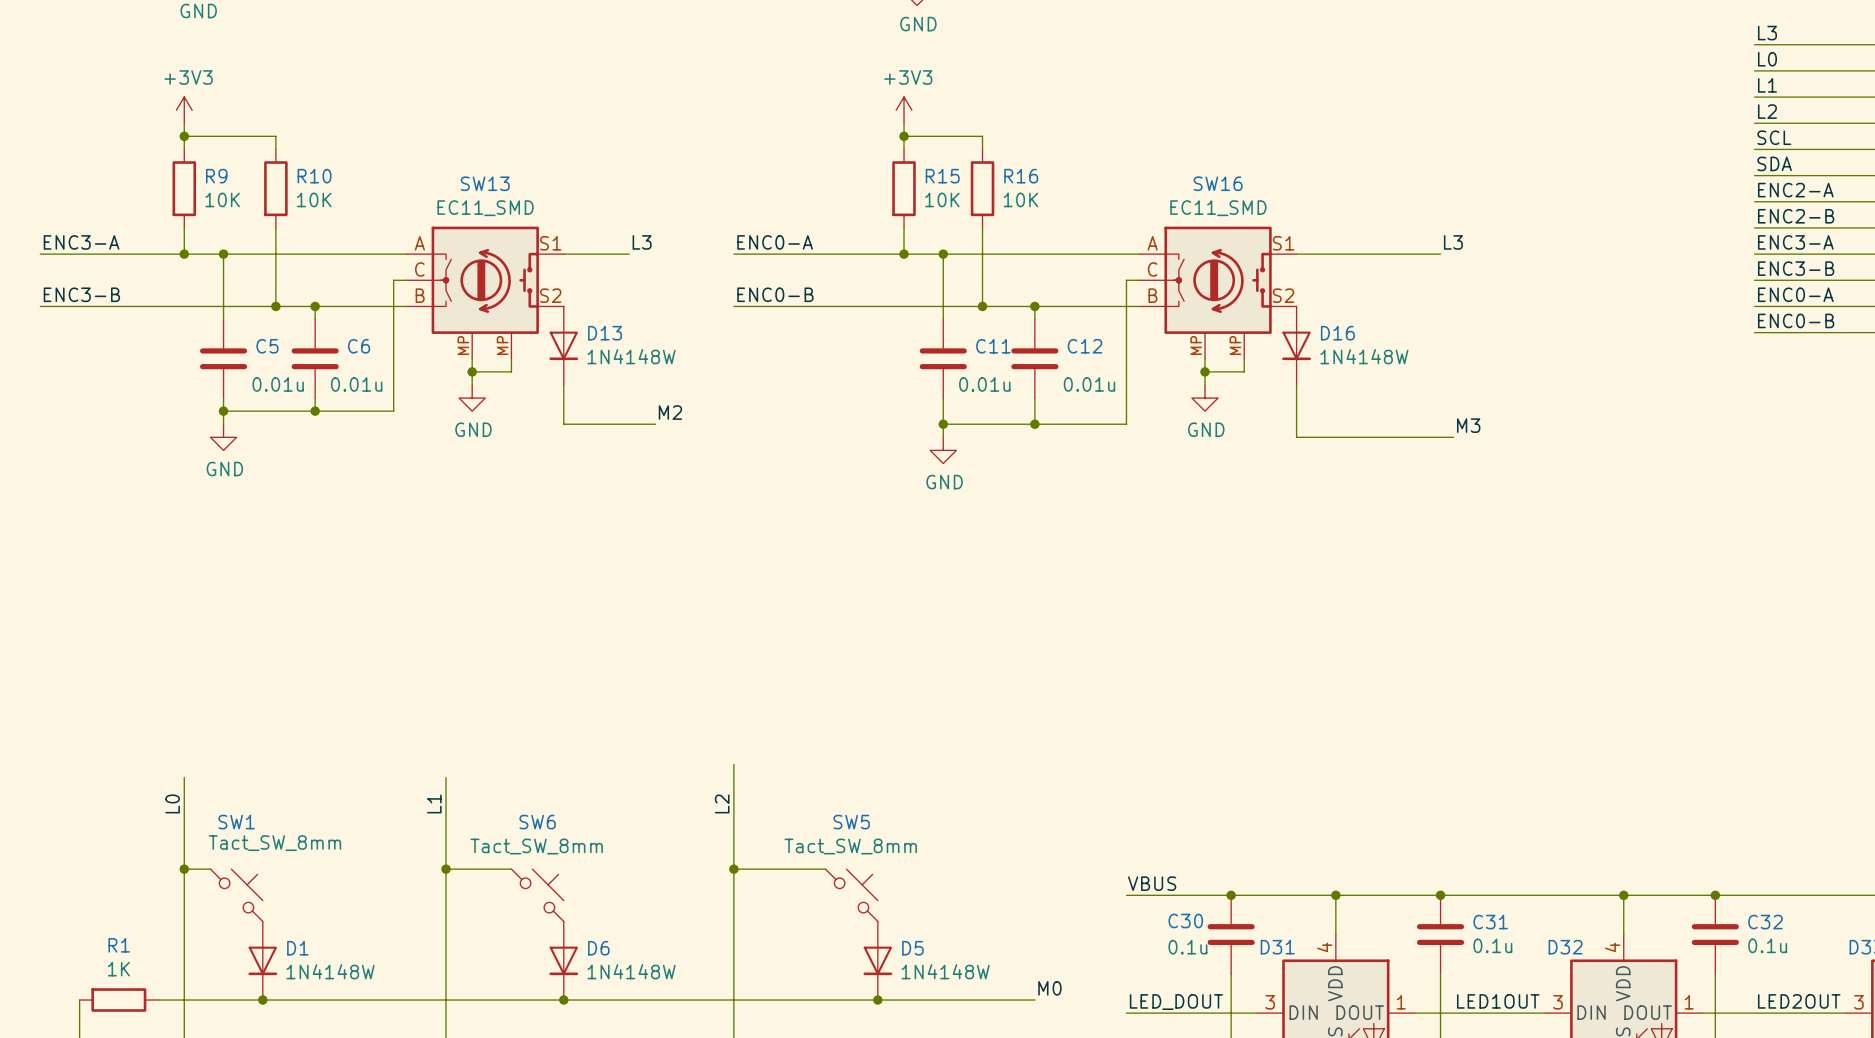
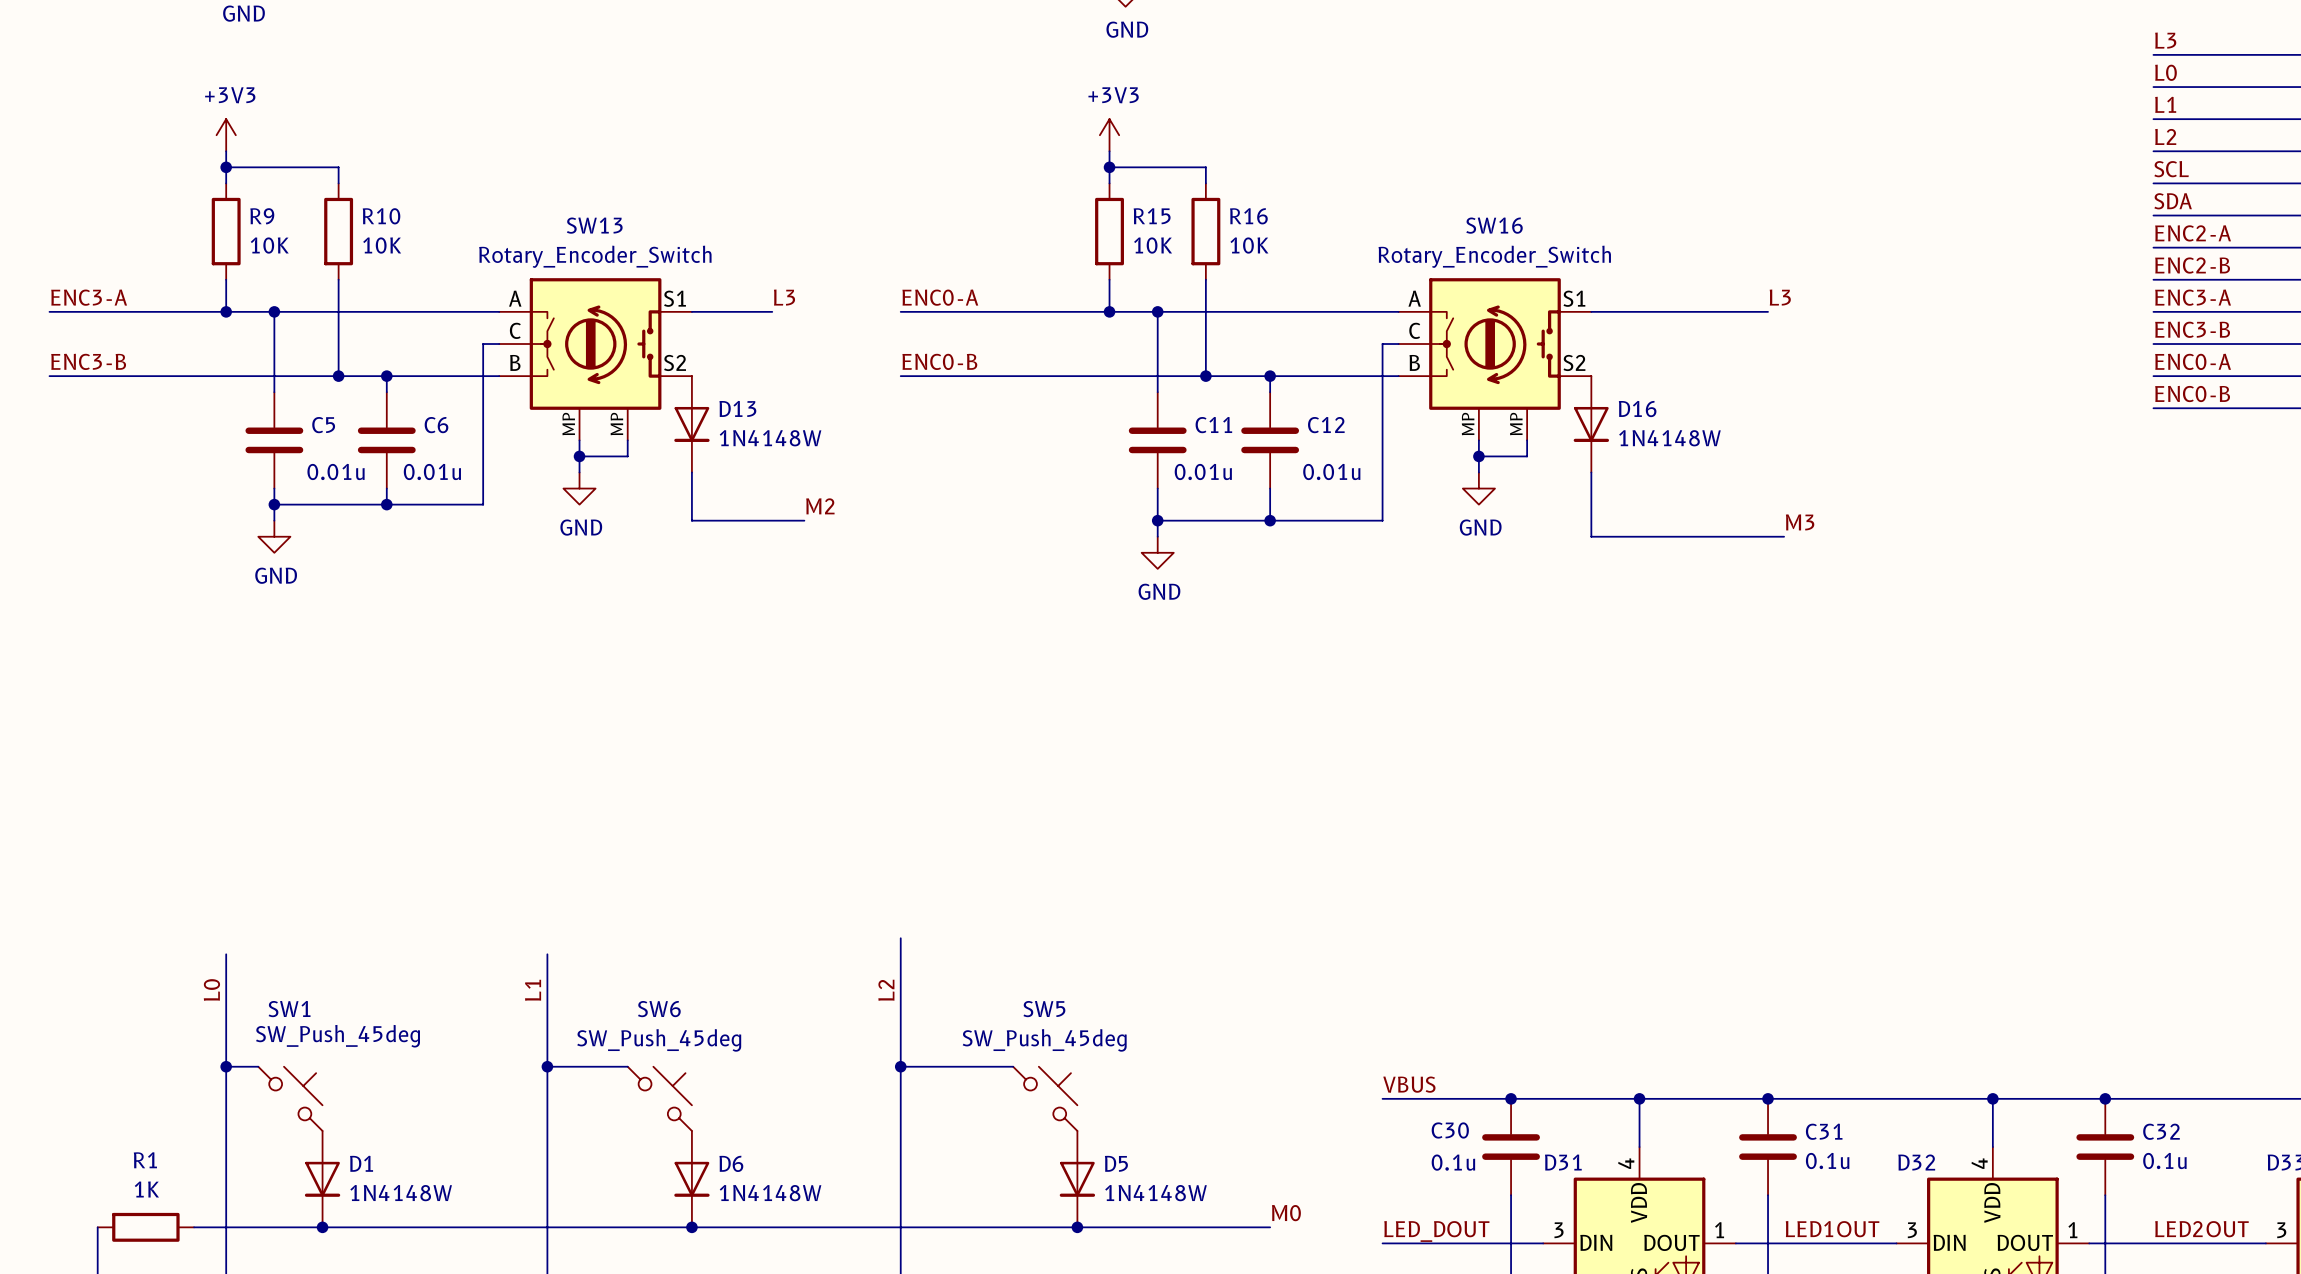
SW13 value: EC11_SMD (485, 208) -> Rotary_Encoder_Switch (595, 256)
SW16 value: EC11_SMD (1218, 208) -> Rotary_Encoder_Switch (1494, 256)
SW1 value: Tact_SW_8mm (274, 843) -> SW_Push_45deg (337, 1036)
SW6 value: Tact_SW_8mm (536, 846) -> SW_Push_45deg (659, 1040)
SW5 value: Tact_SW_8mm (850, 846) -> SW_Push_45deg (1044, 1040)

